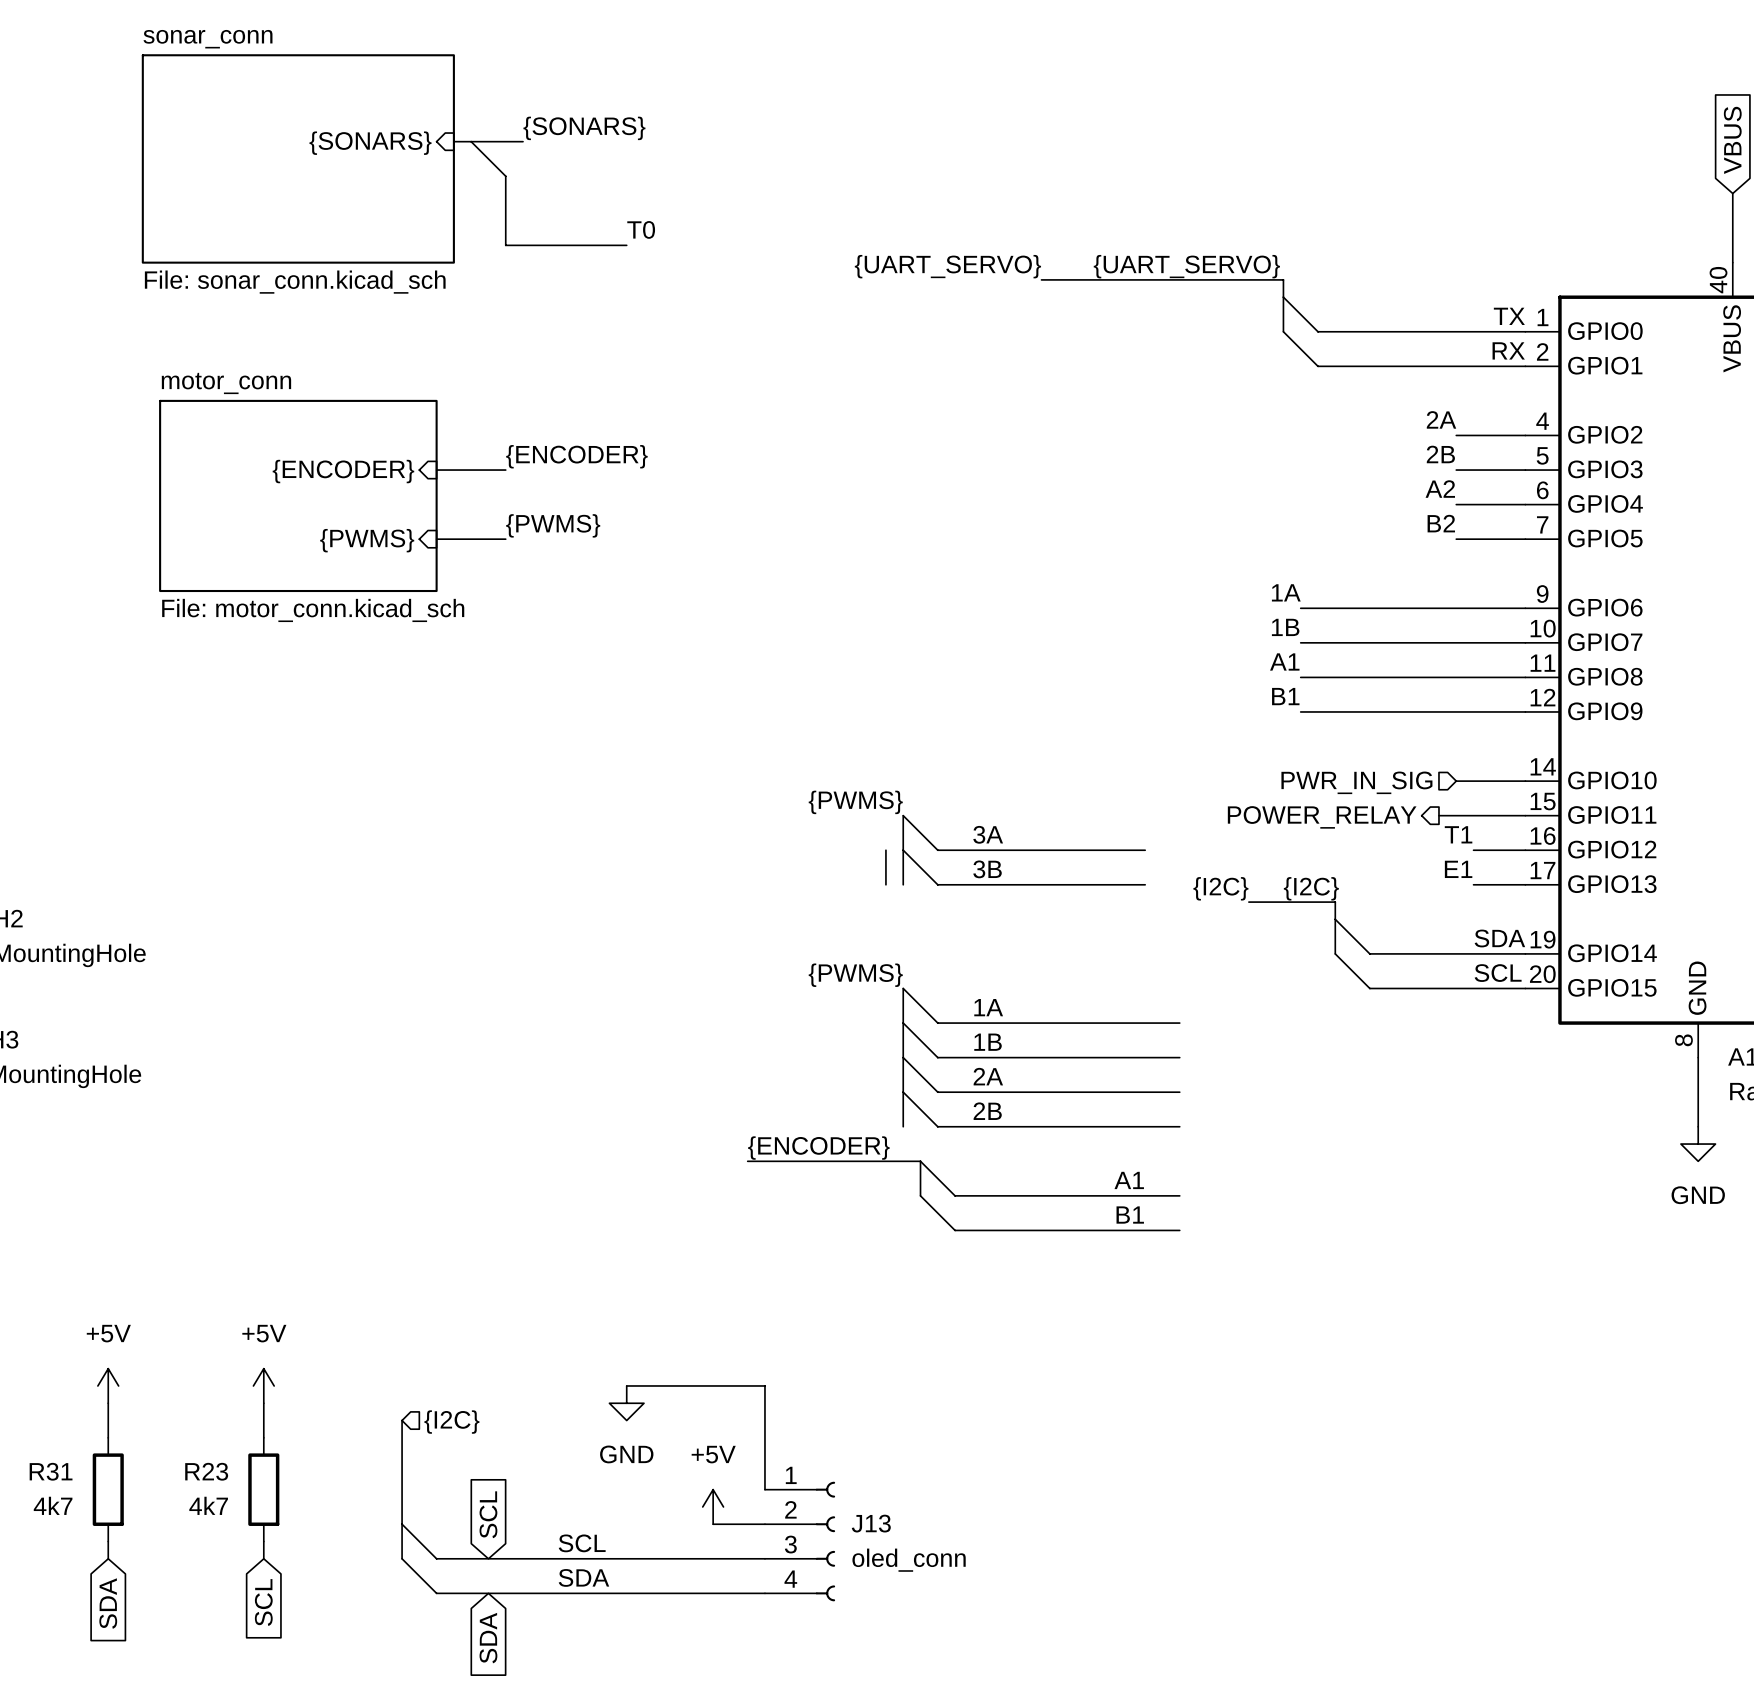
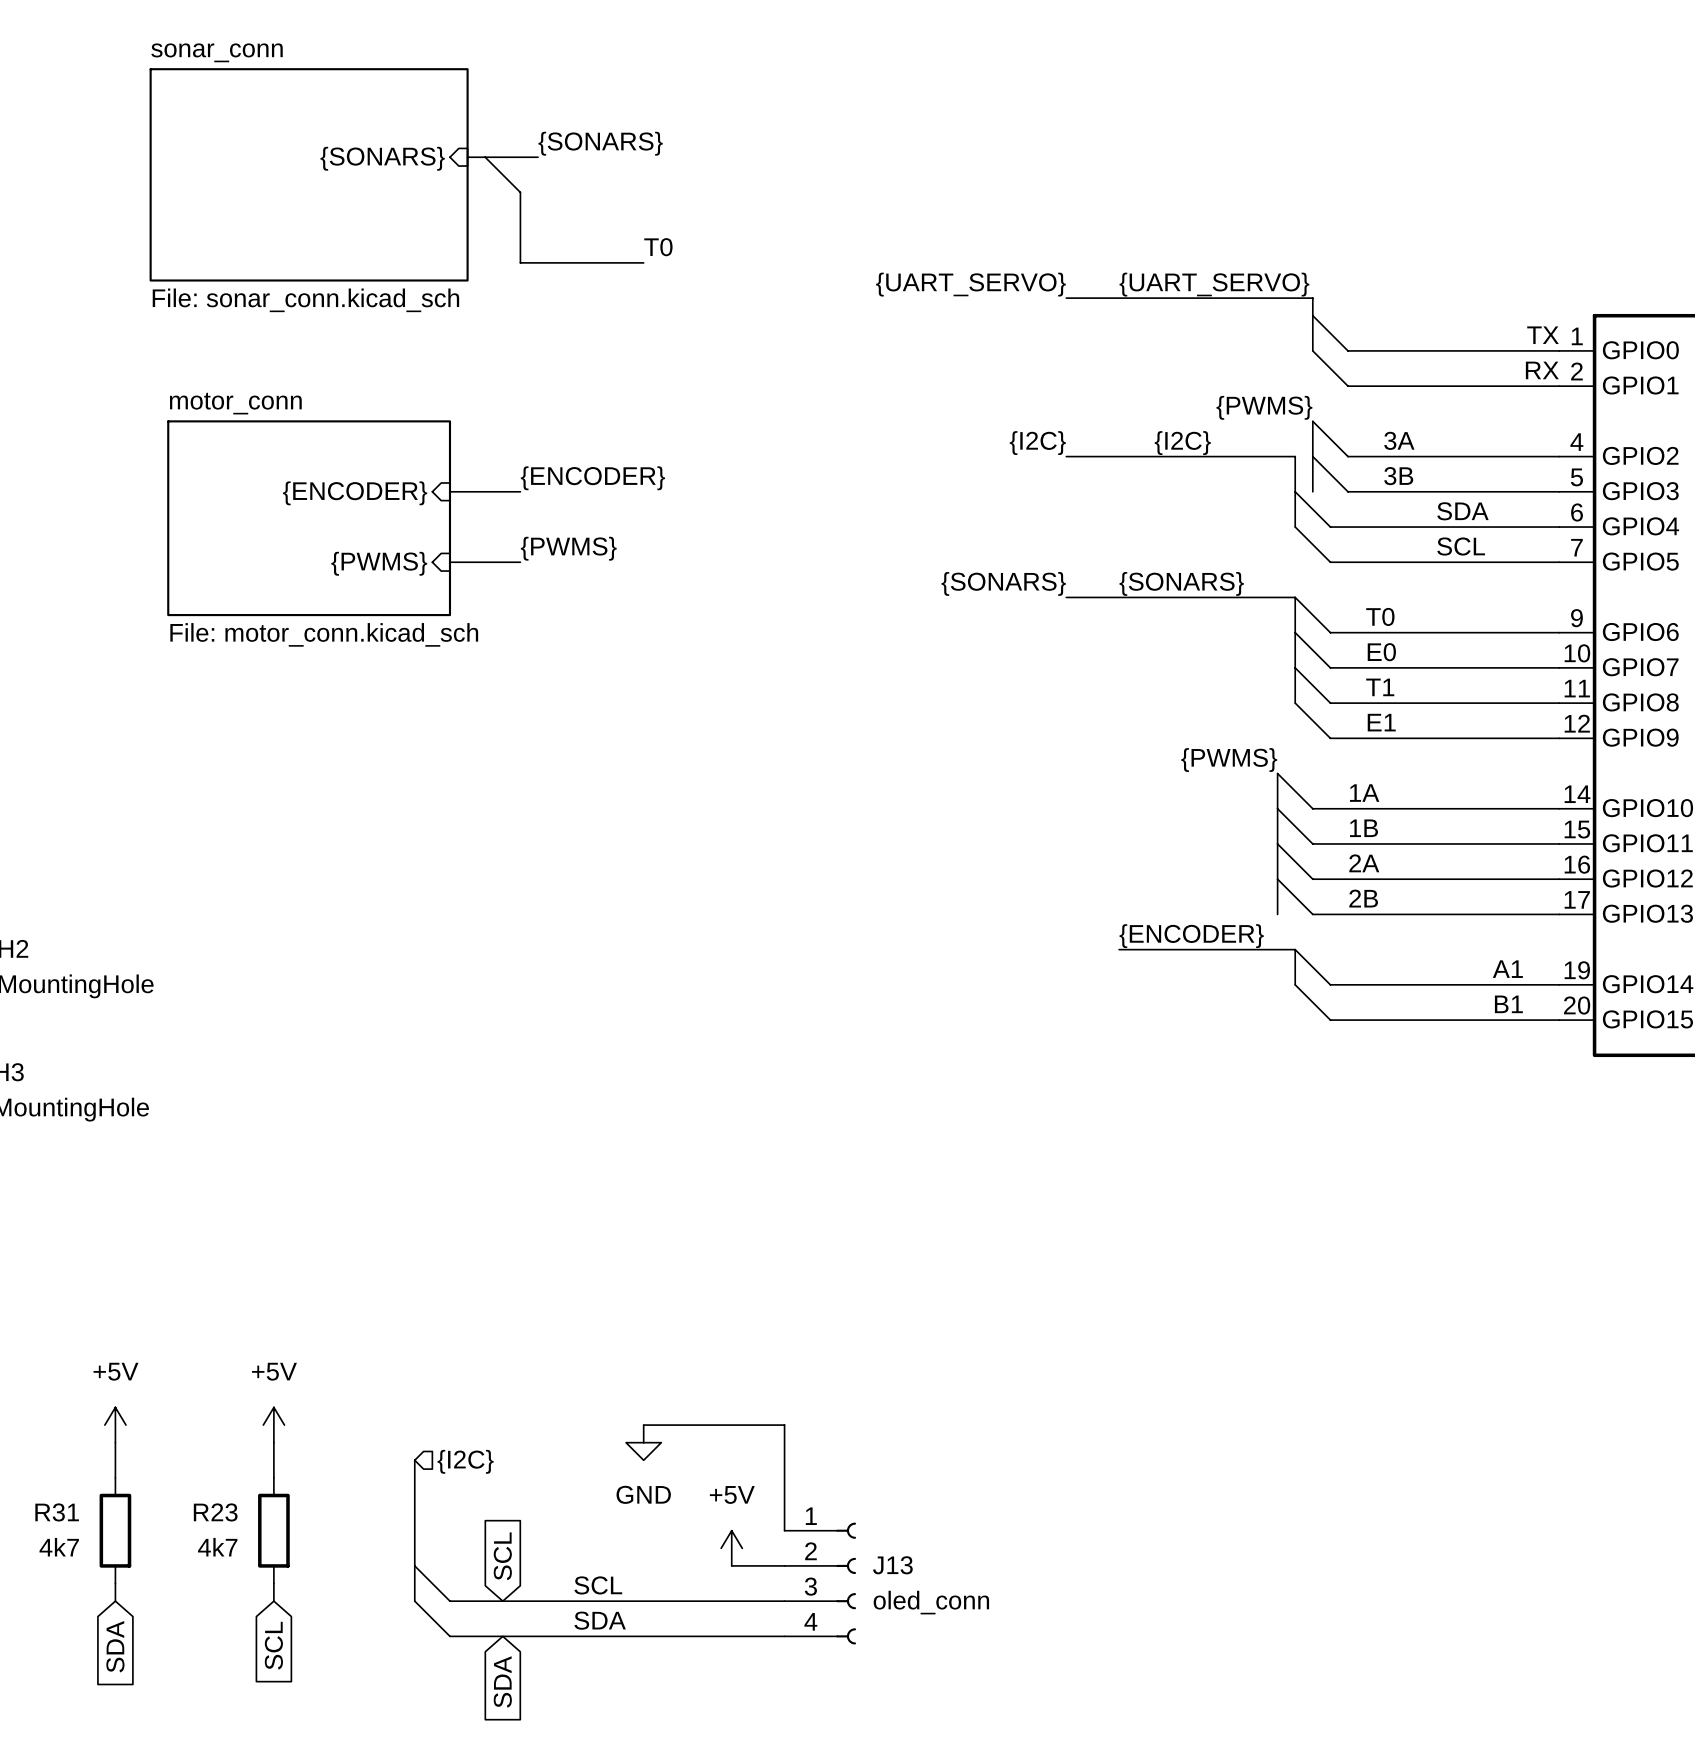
label: none -> {PWMS} (1264, 407)
wire: none -> (1312, 421) (1348, 456) (1488, 456)
bus: none -> (1312, 421) (1312, 491)
label: 2A (1441, 419) -> none
label: none -> 3A (1399, 440)
label: none -> {I2C} (1037, 443)
label: none -> {I2C} (1182, 443)
bus: none -> (1066, 456) (1295, 456) (1295, 527)
wire: none -> (1312, 456) (1348, 491) (1488, 491)
label: none -> 3B (1398, 476)
label: 2B (1440, 454) -> none
wire: none -> (1295, 491) (1330, 527) (1488, 527)
label: none -> SDA (1462, 511)
label: A2 (1440, 489) -> none
wire: none -> (1295, 527) (1330, 562) (1488, 562)
label: none -> SCL (1461, 546)
label: B2 (1441, 523) -> none
label: none -> {SONARS} (1003, 583)
label: none -> {SONARS} (1181, 583)
bus: none -> (1066, 597) (1295, 597) (1295, 703)
wire: none -> (1295, 597) (1330, 632)
label position: 1A (1286, 592) -> 1A (1364, 793)
label: none -> T0 (1380, 616)
wire: none -> (1295, 632) (1330, 667)
label position: 1B (1285, 627) -> 1B (1363, 828)
label: none -> E0 (1381, 652)
wire: none -> (1295, 667) (1330, 703)
label: A1 (1284, 661) -> none
wire: none -> (1295, 703) (1330, 738)
label: B1 (1285, 696) -> none
label: none -> {PWMS} (1229, 760)
wire: none -> (1277, 773) (1312, 808) (1488, 808)
bus: none -> (1277, 773) (1277, 914)
wire: none -> (1277, 808) (1312, 843) (1471, 843)
hierarchical label: PWR_IN_SIG (1356, 782) -> none
label: {PWMS} (855, 802) -> none
wire: (903, 815) (937, 850) (1145, 850) -> none
bus: (903, 815) (903, 884) -> none
wire: none -> (1277, 843) (1312, 879) (1506, 879)
hierarchical label: POWER_RELAY (1322, 817) -> none
label: 3A (988, 834) -> none
label: none -> 2A (1364, 863)
label position: T1 (1458, 834) -> T1 (1380, 687)
bus: (885, 850) (885, 884) -> none
wire: (903, 850) (937, 884) (1145, 884) -> none
wire: none -> (1277, 879) (1312, 914) (1506, 914)
label: 3B (987, 869) -> none
label: none -> 2B (1363, 898)
label position: E1 (1458, 869) -> E1 (1381, 722)
label: {I2C} (1220, 888) -> none
label: {I2C} (1311, 888) -> none
bus: (1248, 902) (1335, 902) (1335, 953) -> none
label: none -> {ENCODER} (1191, 936)
bus: none -> (1119, 949) (1295, 949) (1295, 984)
wire: (1335, 919) (1369, 953) -> (1295, 949) (1330, 984) (1400, 984)
label: none -> A1 (1507, 969)
label: SDA (1499, 938) -> none
wire: (1335, 953) (1369, 988) -> (1295, 984) (1330, 1020) (1400, 1020)
label: none -> B1 (1508, 1004)
label: SCL (1498, 973) -> none
label: {PWMS} (855, 975) -> none
wire: (903, 988) (937, 1023) (1179, 1023) -> none
bus: (903, 988) (903, 1126) -> none
label: 1A (988, 1007) -> none
wire: (903, 1023) (937, 1057) (1179, 1057) -> none
label: 1B (988, 1042) -> none
wire: (903, 1057) (937, 1092) (1179, 1092) -> none
label: 2A (988, 1076) -> none
wire: (903, 1092) (937, 1126) (1179, 1126) -> none
label: 2B (987, 1111) -> none
label: {ENCODER} (818, 1148) -> none
bus: (747, 1161) (920, 1161) (920, 1195) -> none
wire: (920, 1161) (955, 1195) (1179, 1195) -> none
label: A1 (1129, 1180) -> none
wire: (920, 1195) (955, 1230) (1179, 1230) -> none
label: B1 (1130, 1215) -> none

